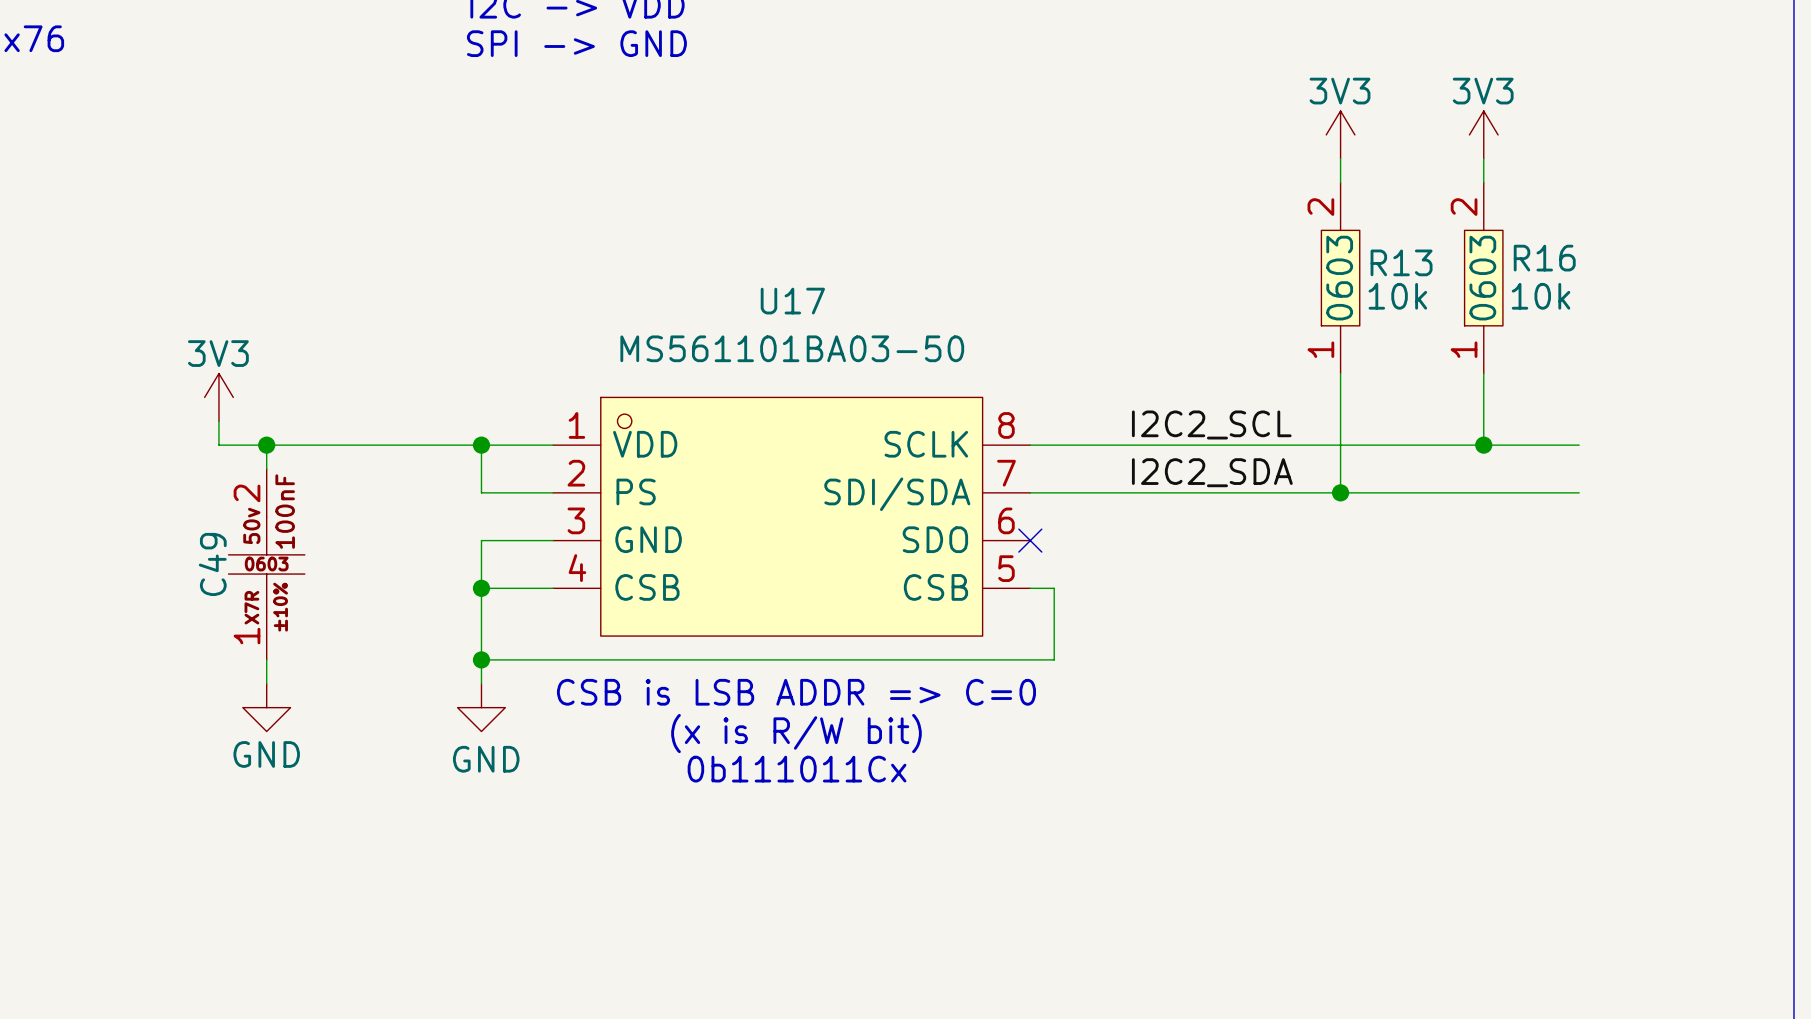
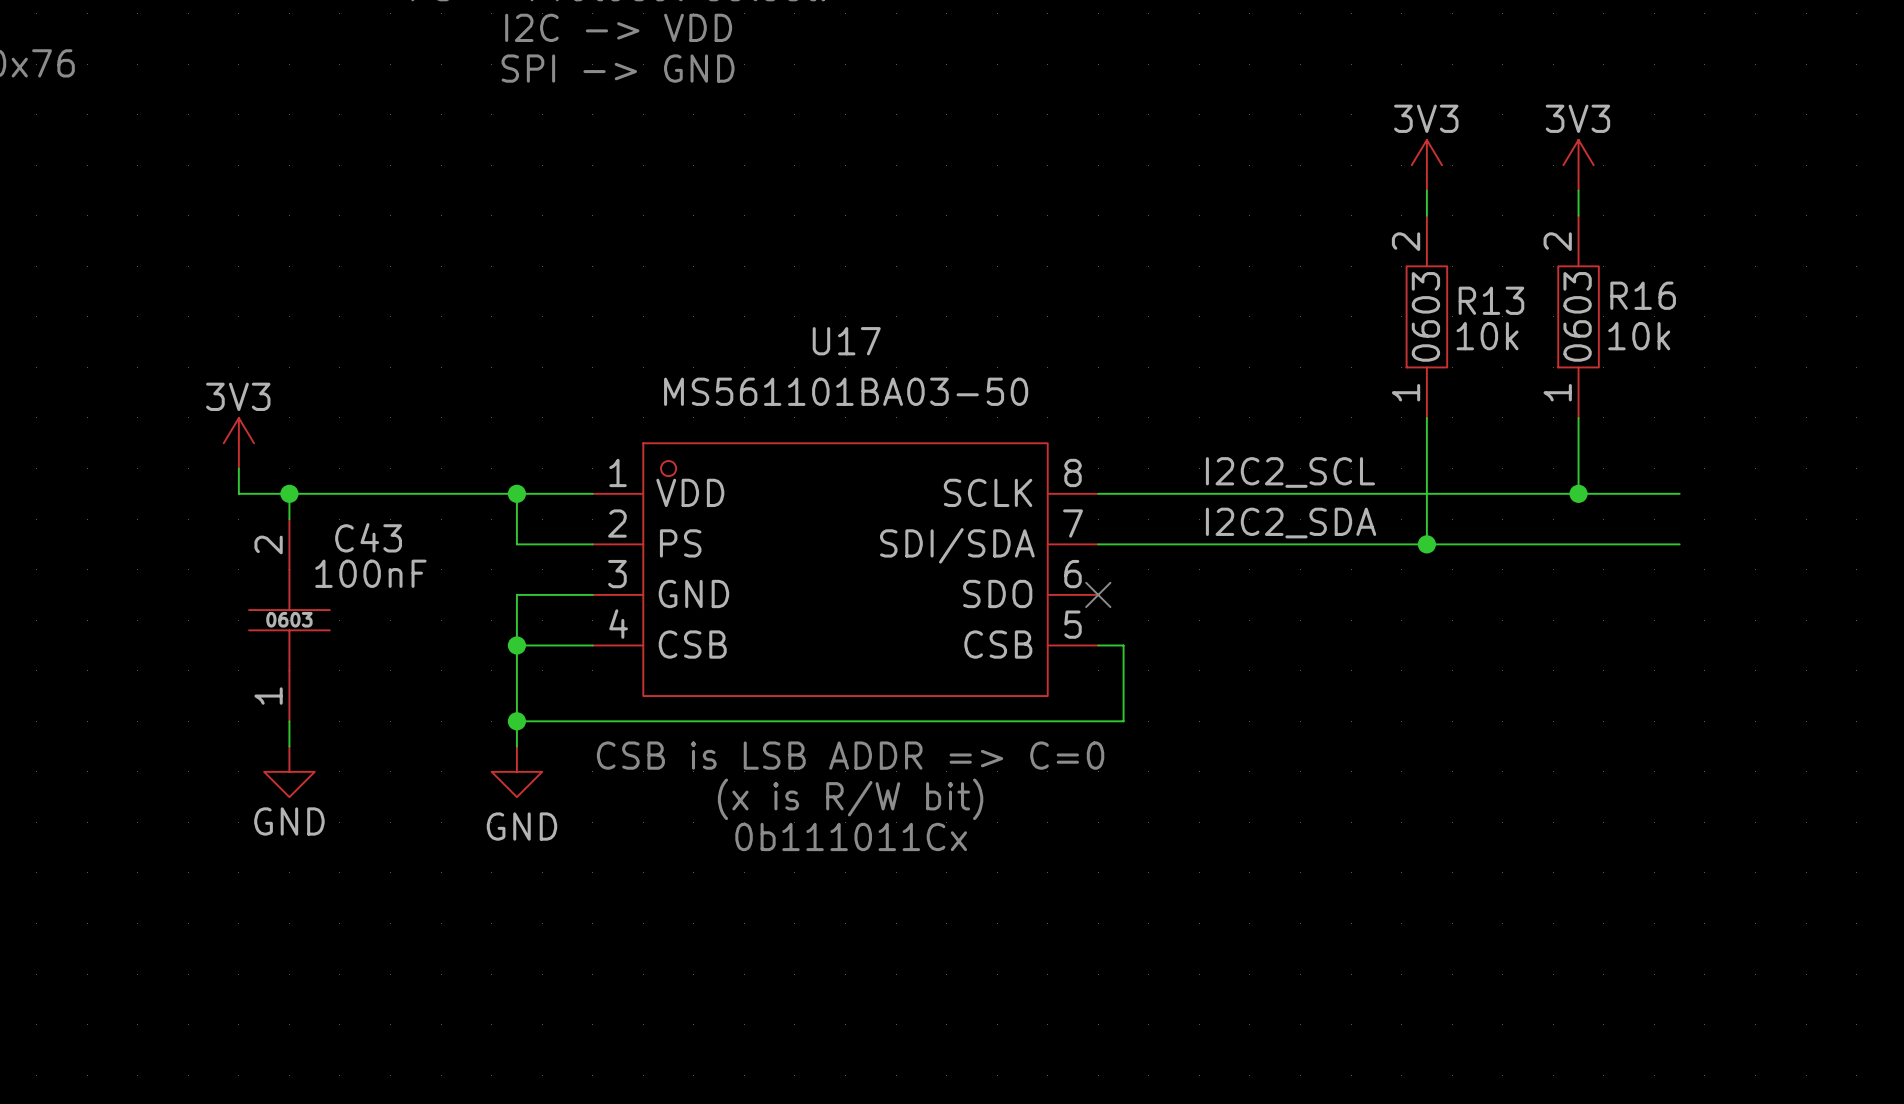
C49 text: 100nF (285, 511) -> none
C49 text: none -> 100nF (370, 573)
C49 text: 50v (251, 525) -> none
C49 name: C49 (212, 564) -> C43 (368, 537)
C49 text: 0603 (266, 564) -> none
C49 text: none -> 0603 (289, 619)
C49 text: X7R (251, 607) -> none
C49 text: ±10% (280, 607) -> none

